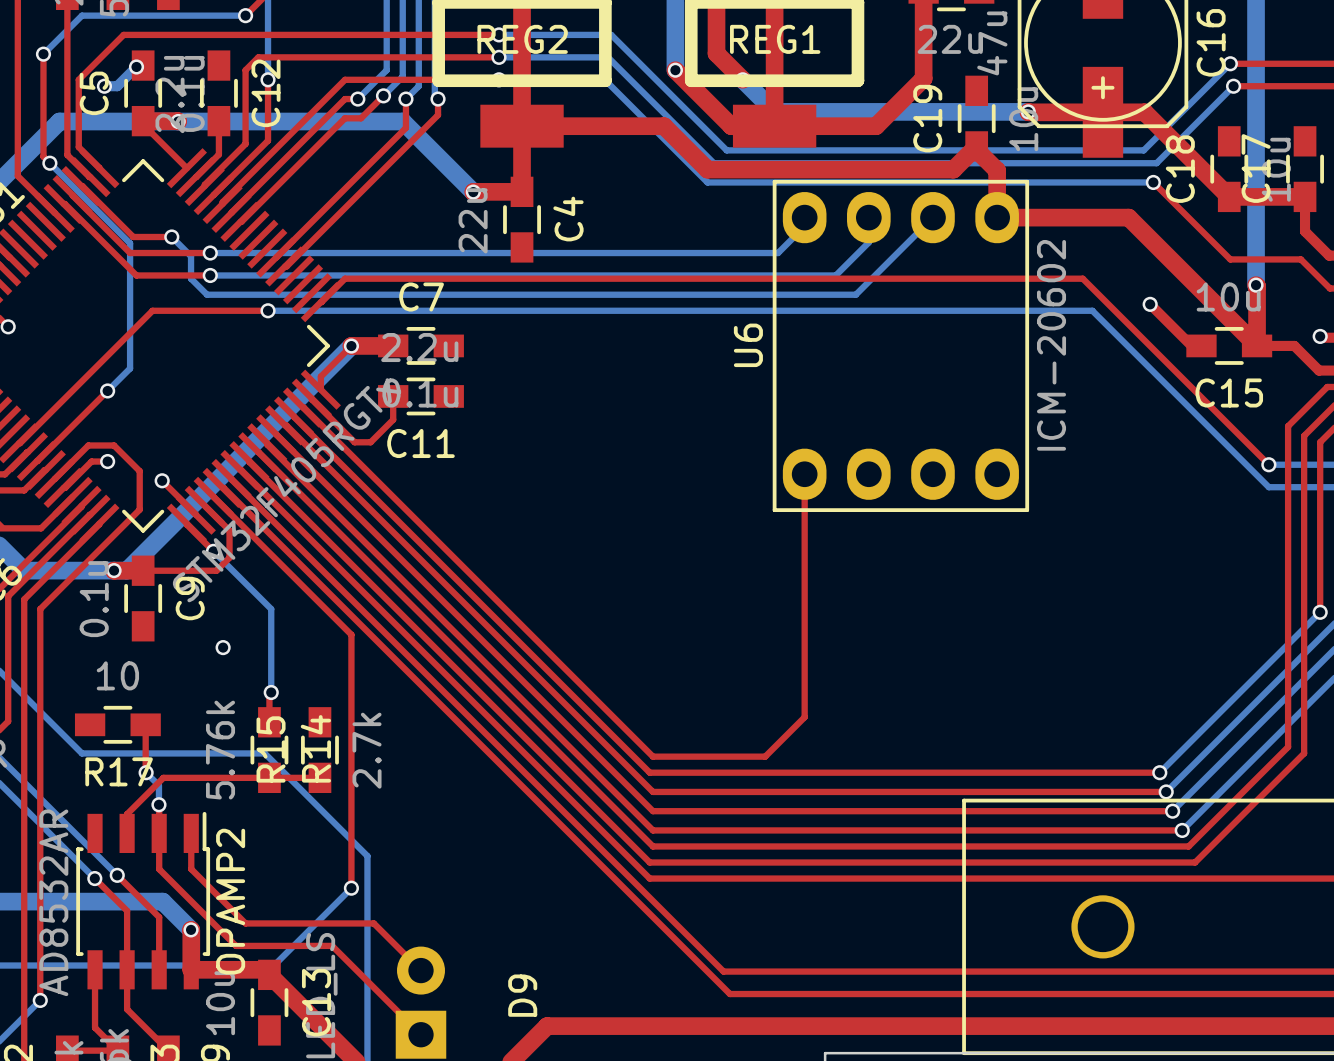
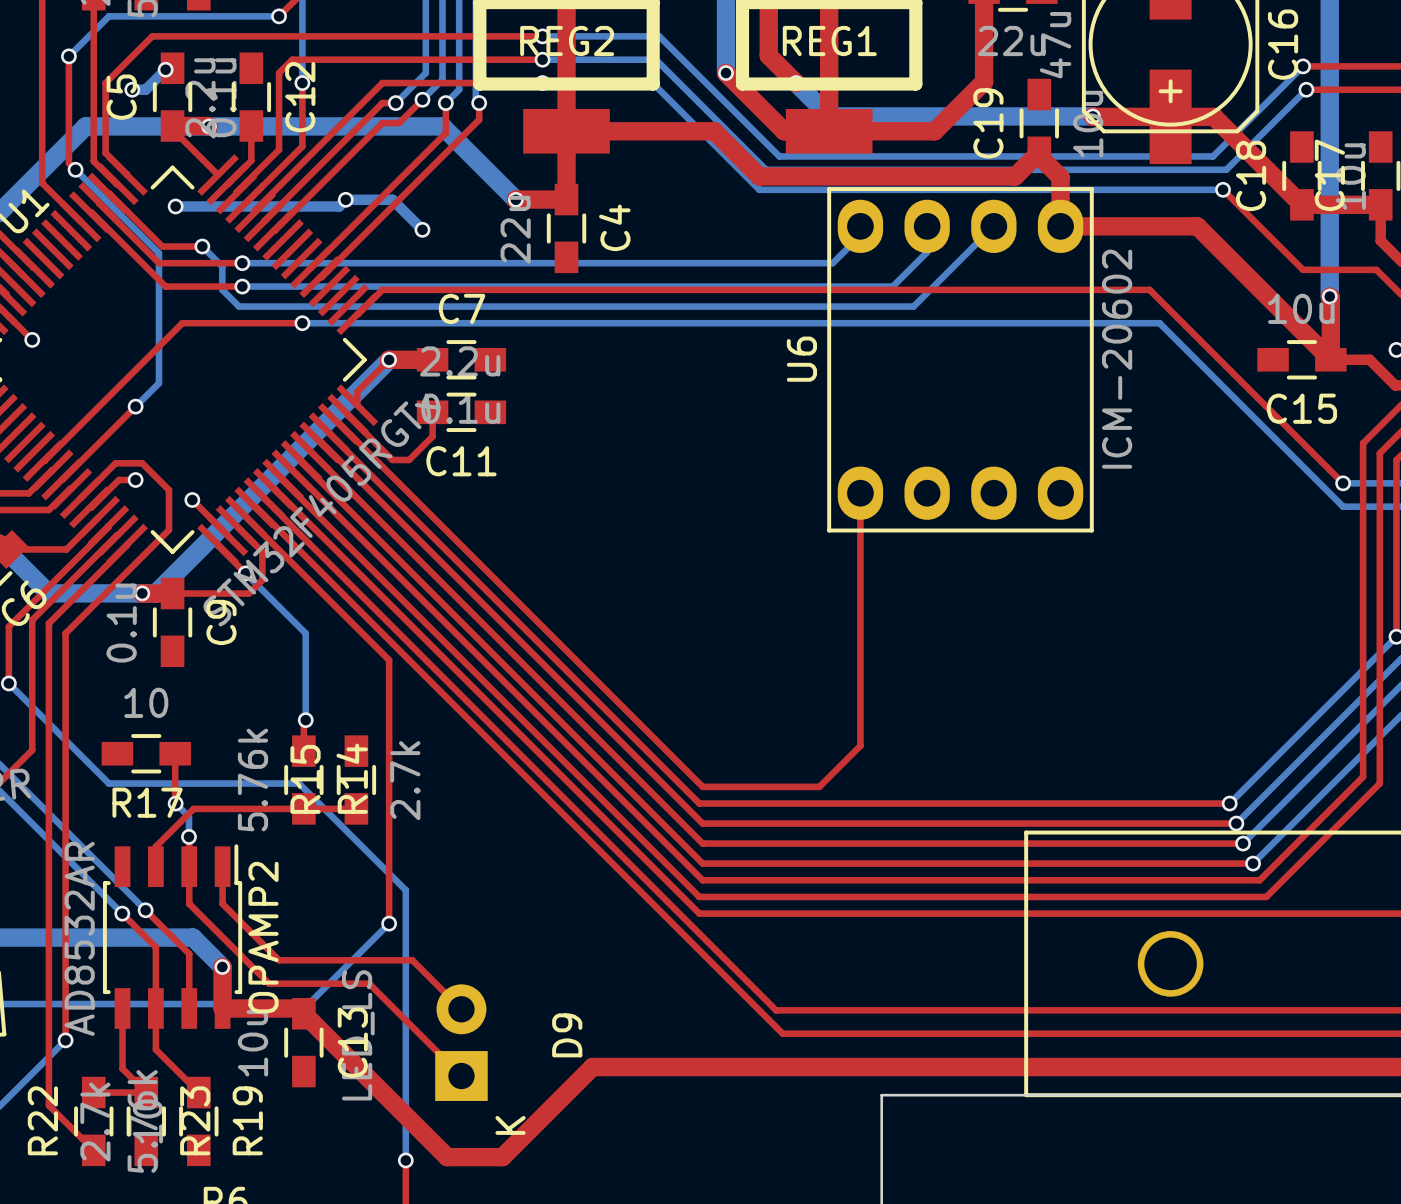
via: none -> (345, 199)
bottom track: none -> (175, 206) (339, 206) (345, 199) (392, 199) (422, 229)
via: none -> (175, 206)
via: none -> (422, 229)
top track: (1150, 304) (1191, 345) (1201, 345) -> none
via: (1150, 304) -> none
via: (223, 647) -> none

